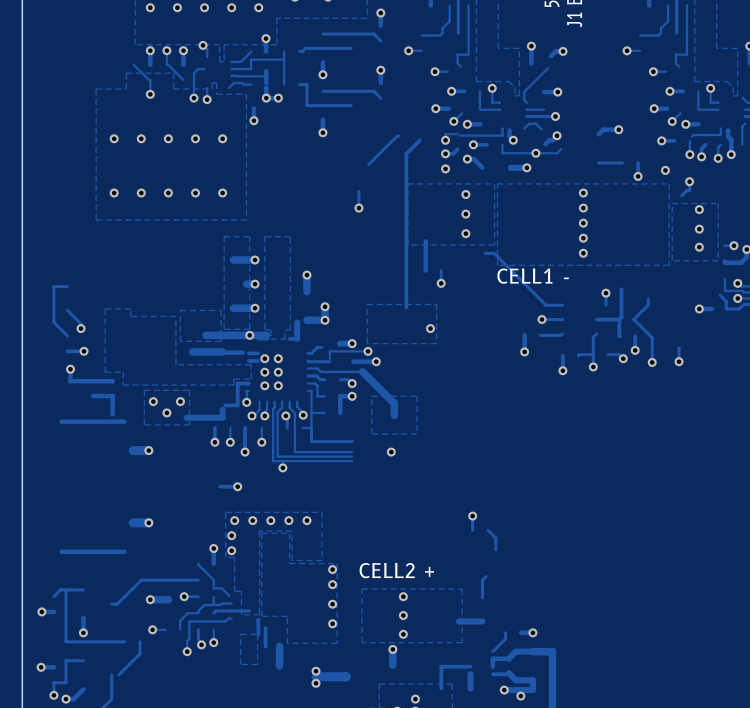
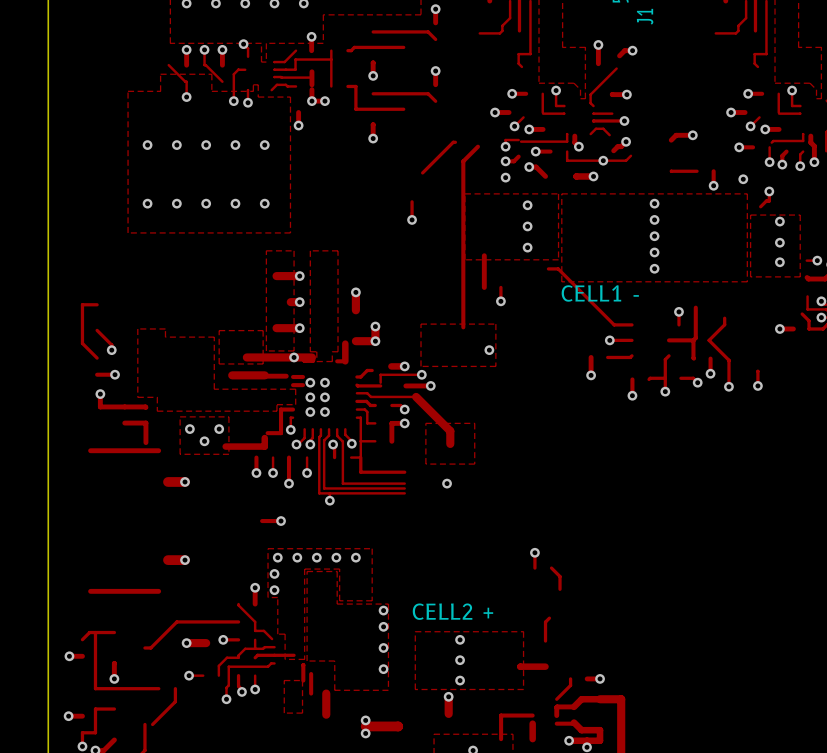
track: (408, 50) (421, 50) -> none
via: (408, 50) -> none
track: (627, 50) (640, 50) -> none
via: (627, 50) -> none
track: (435, 71) (447, 71) -> none
via: (435, 71) -> none
track: (653, 71) (666, 71) -> none
via: (653, 71) -> none

